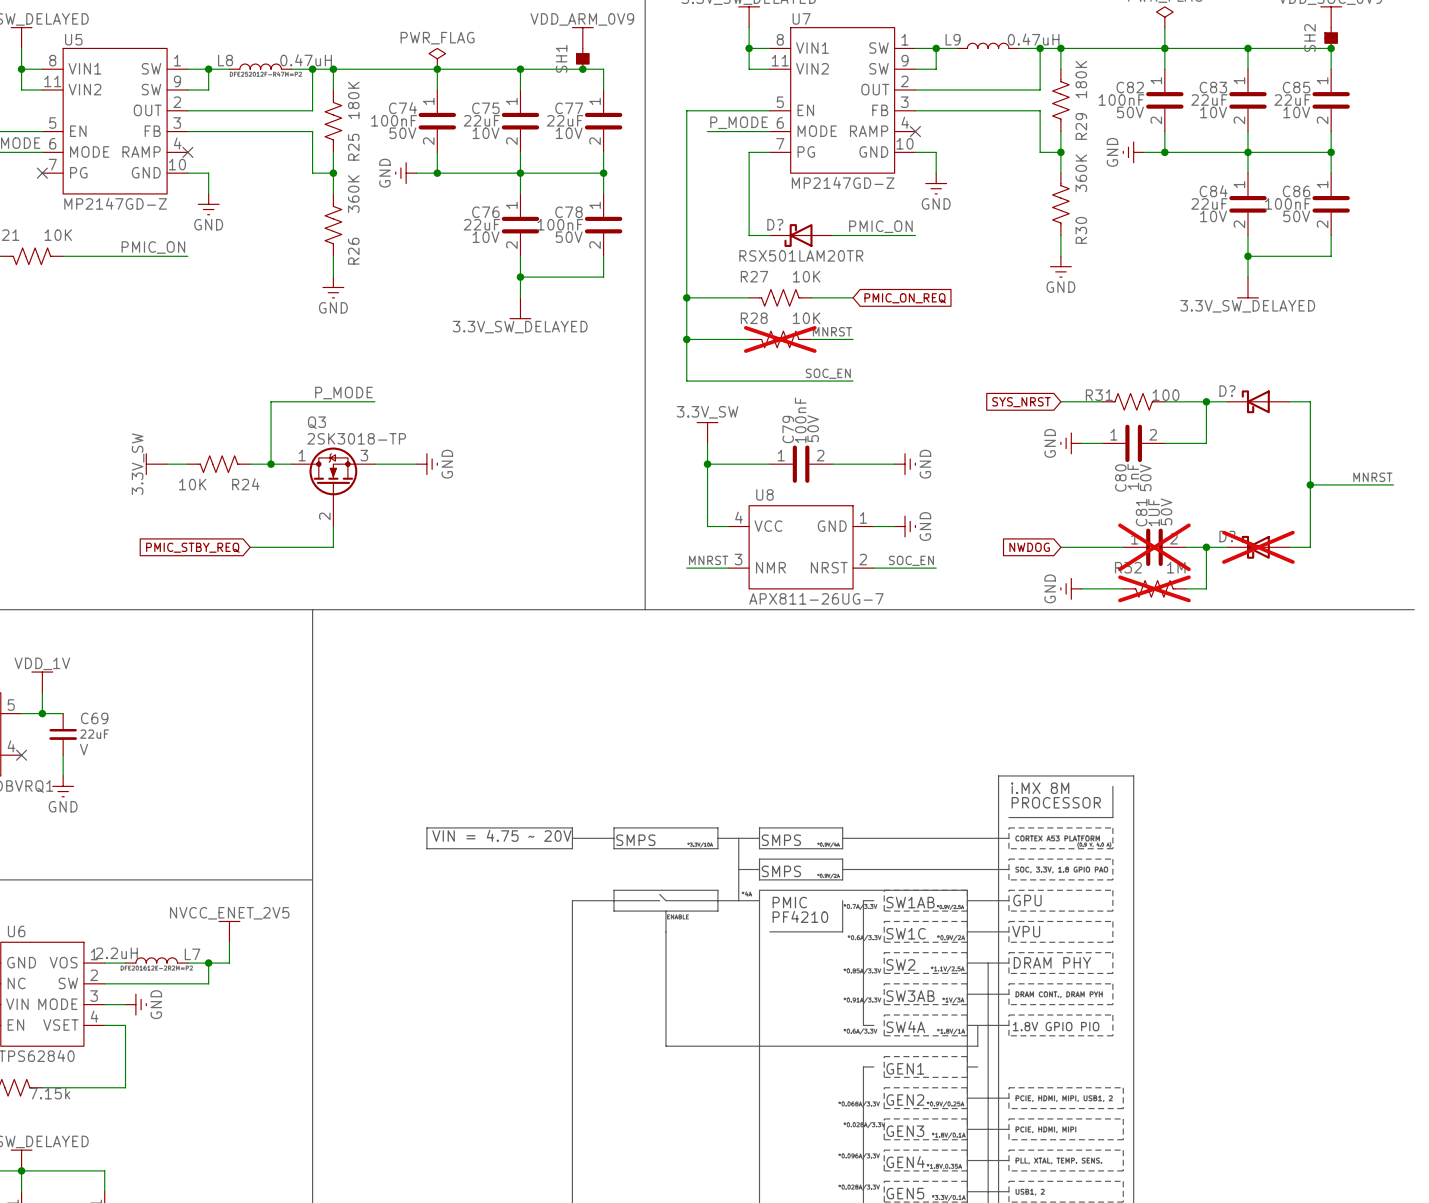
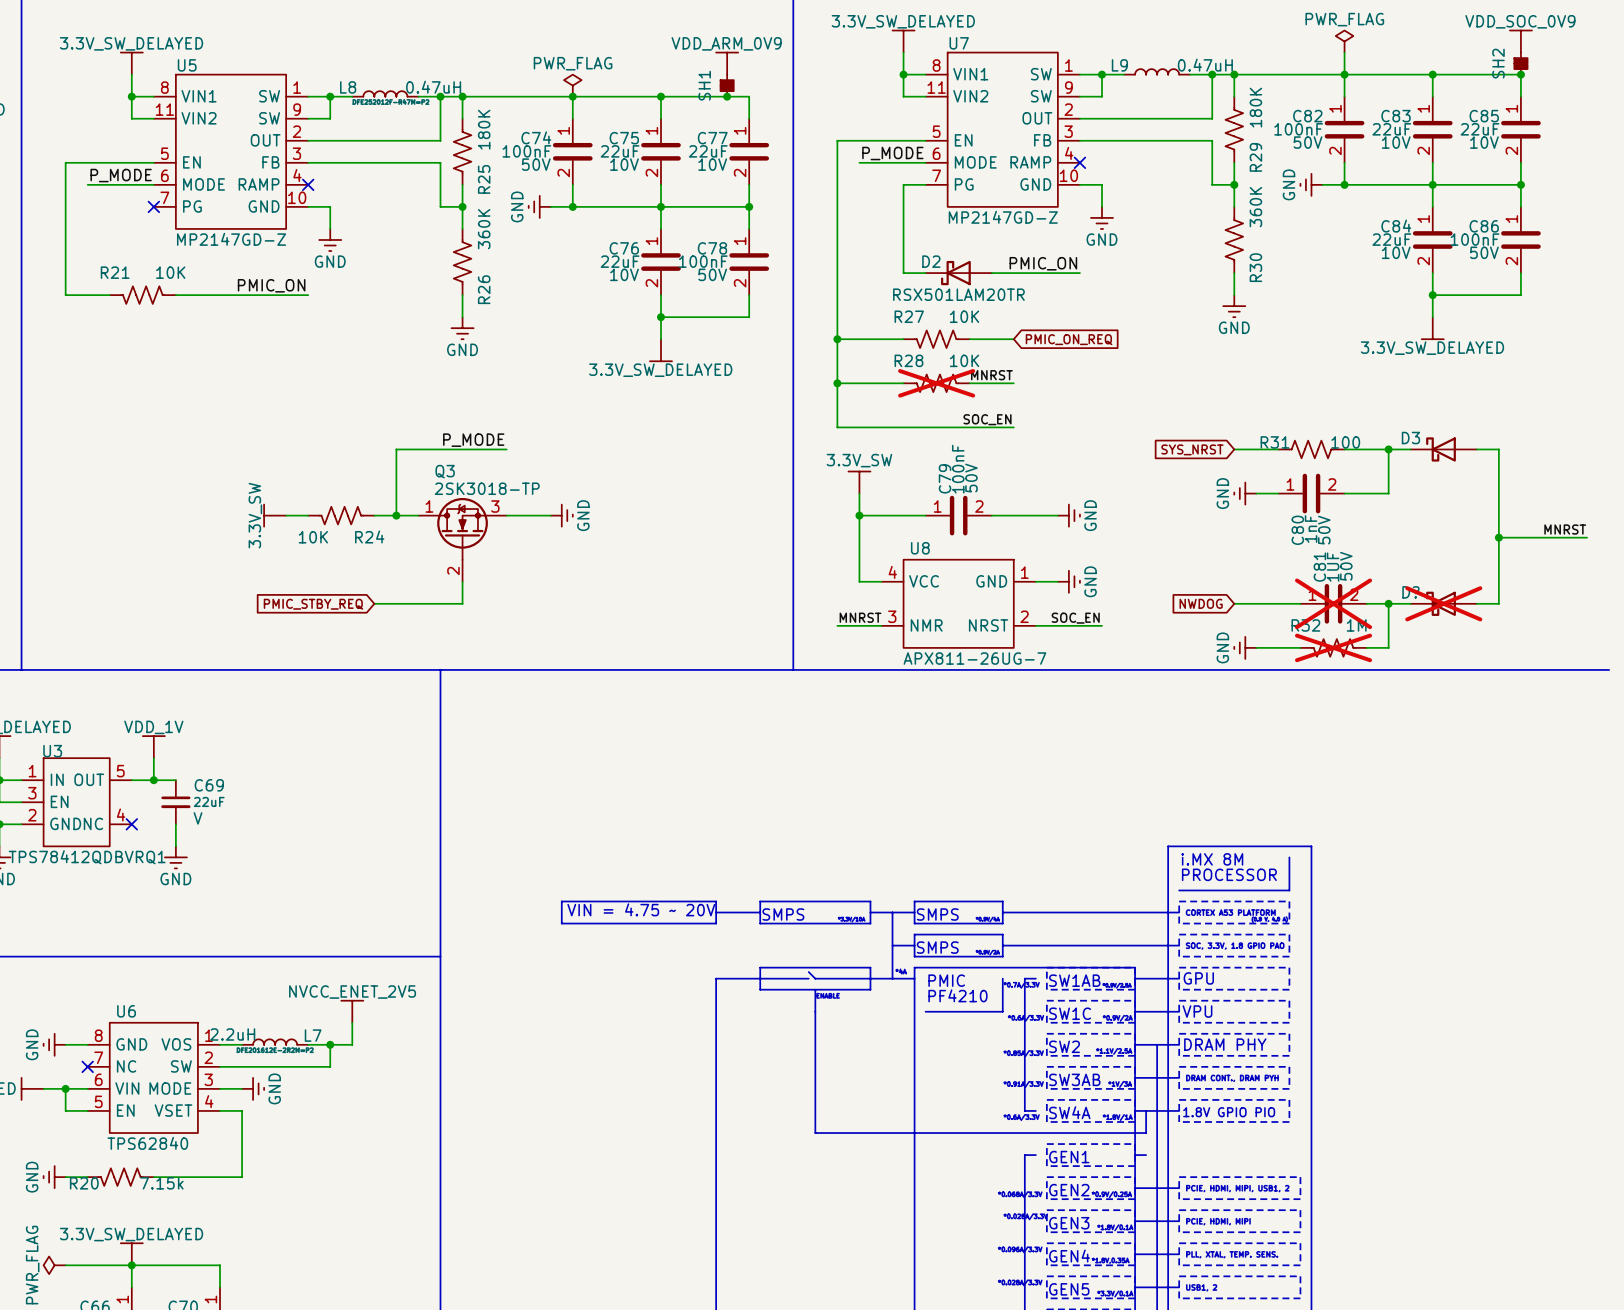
D? name: D? (775, 224) -> D2 (931, 261)
D? name: D? (1227, 391) -> D3 (1410, 438)

